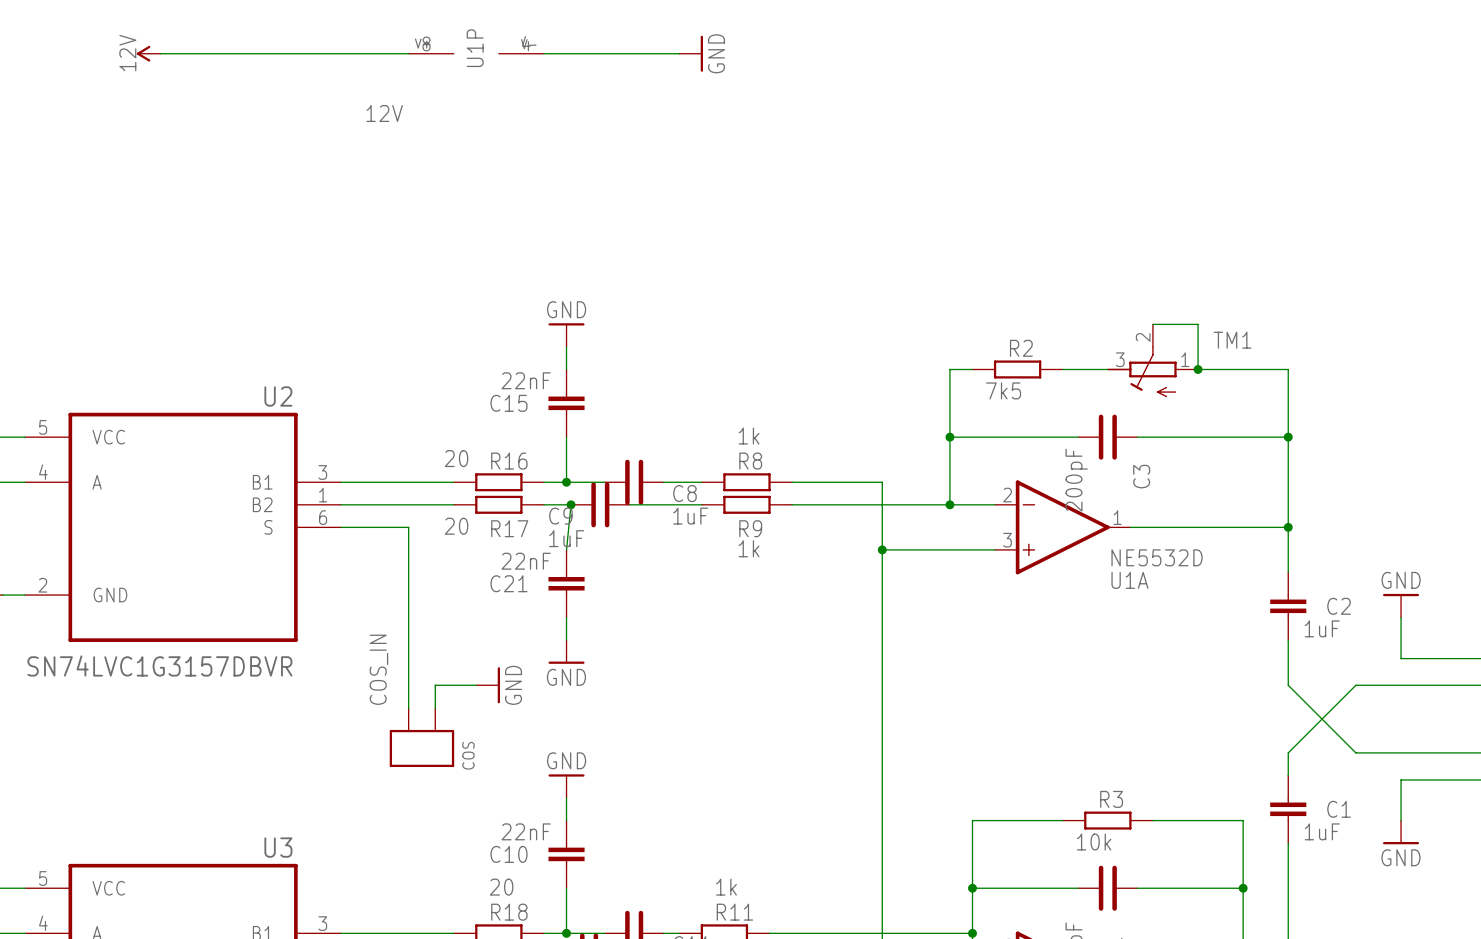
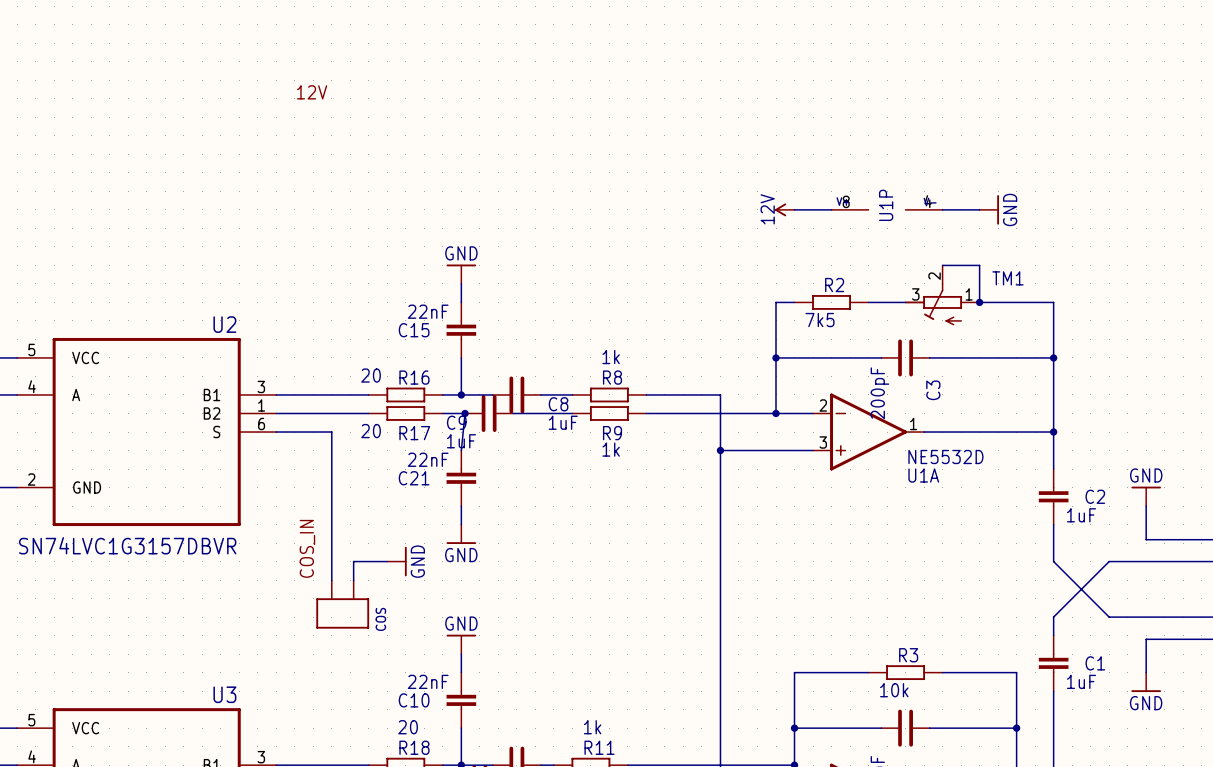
power symbol: 12V (148, 53) -> none
wire: (160, 53) (408, 53) -> none
U1P position: (476, 53) -> (887, 209)
wire: (543, 53) (679, 53) -> none
power symbol: GND (691, 53) -> none
power symbol: none -> 12V (784, 209)
wire: none -> (794, 209) (831, 209)
wire: none -> (942, 209) (979, 209)
power symbol: none -> GND (989, 209)

